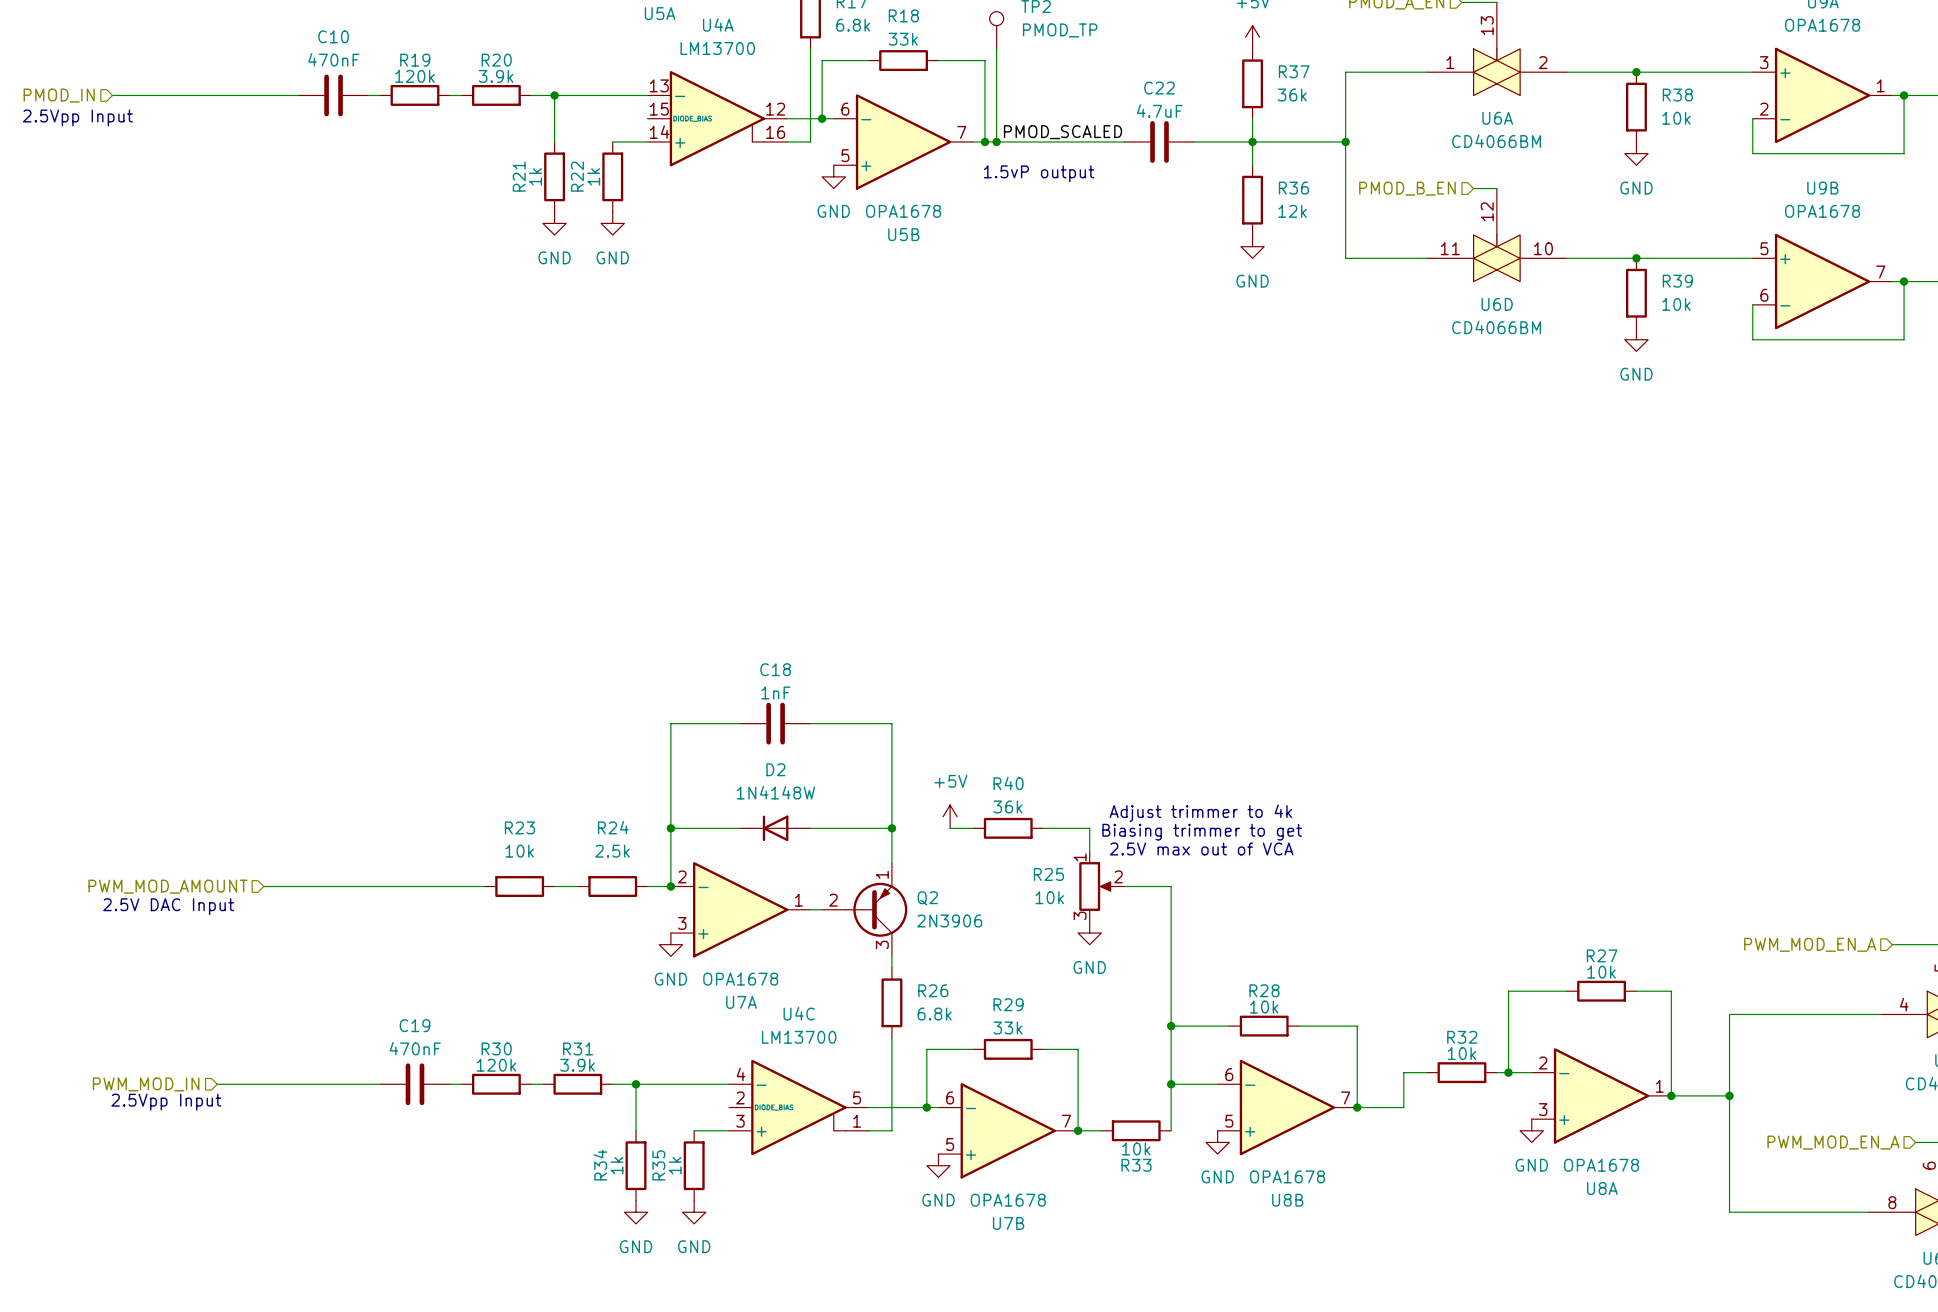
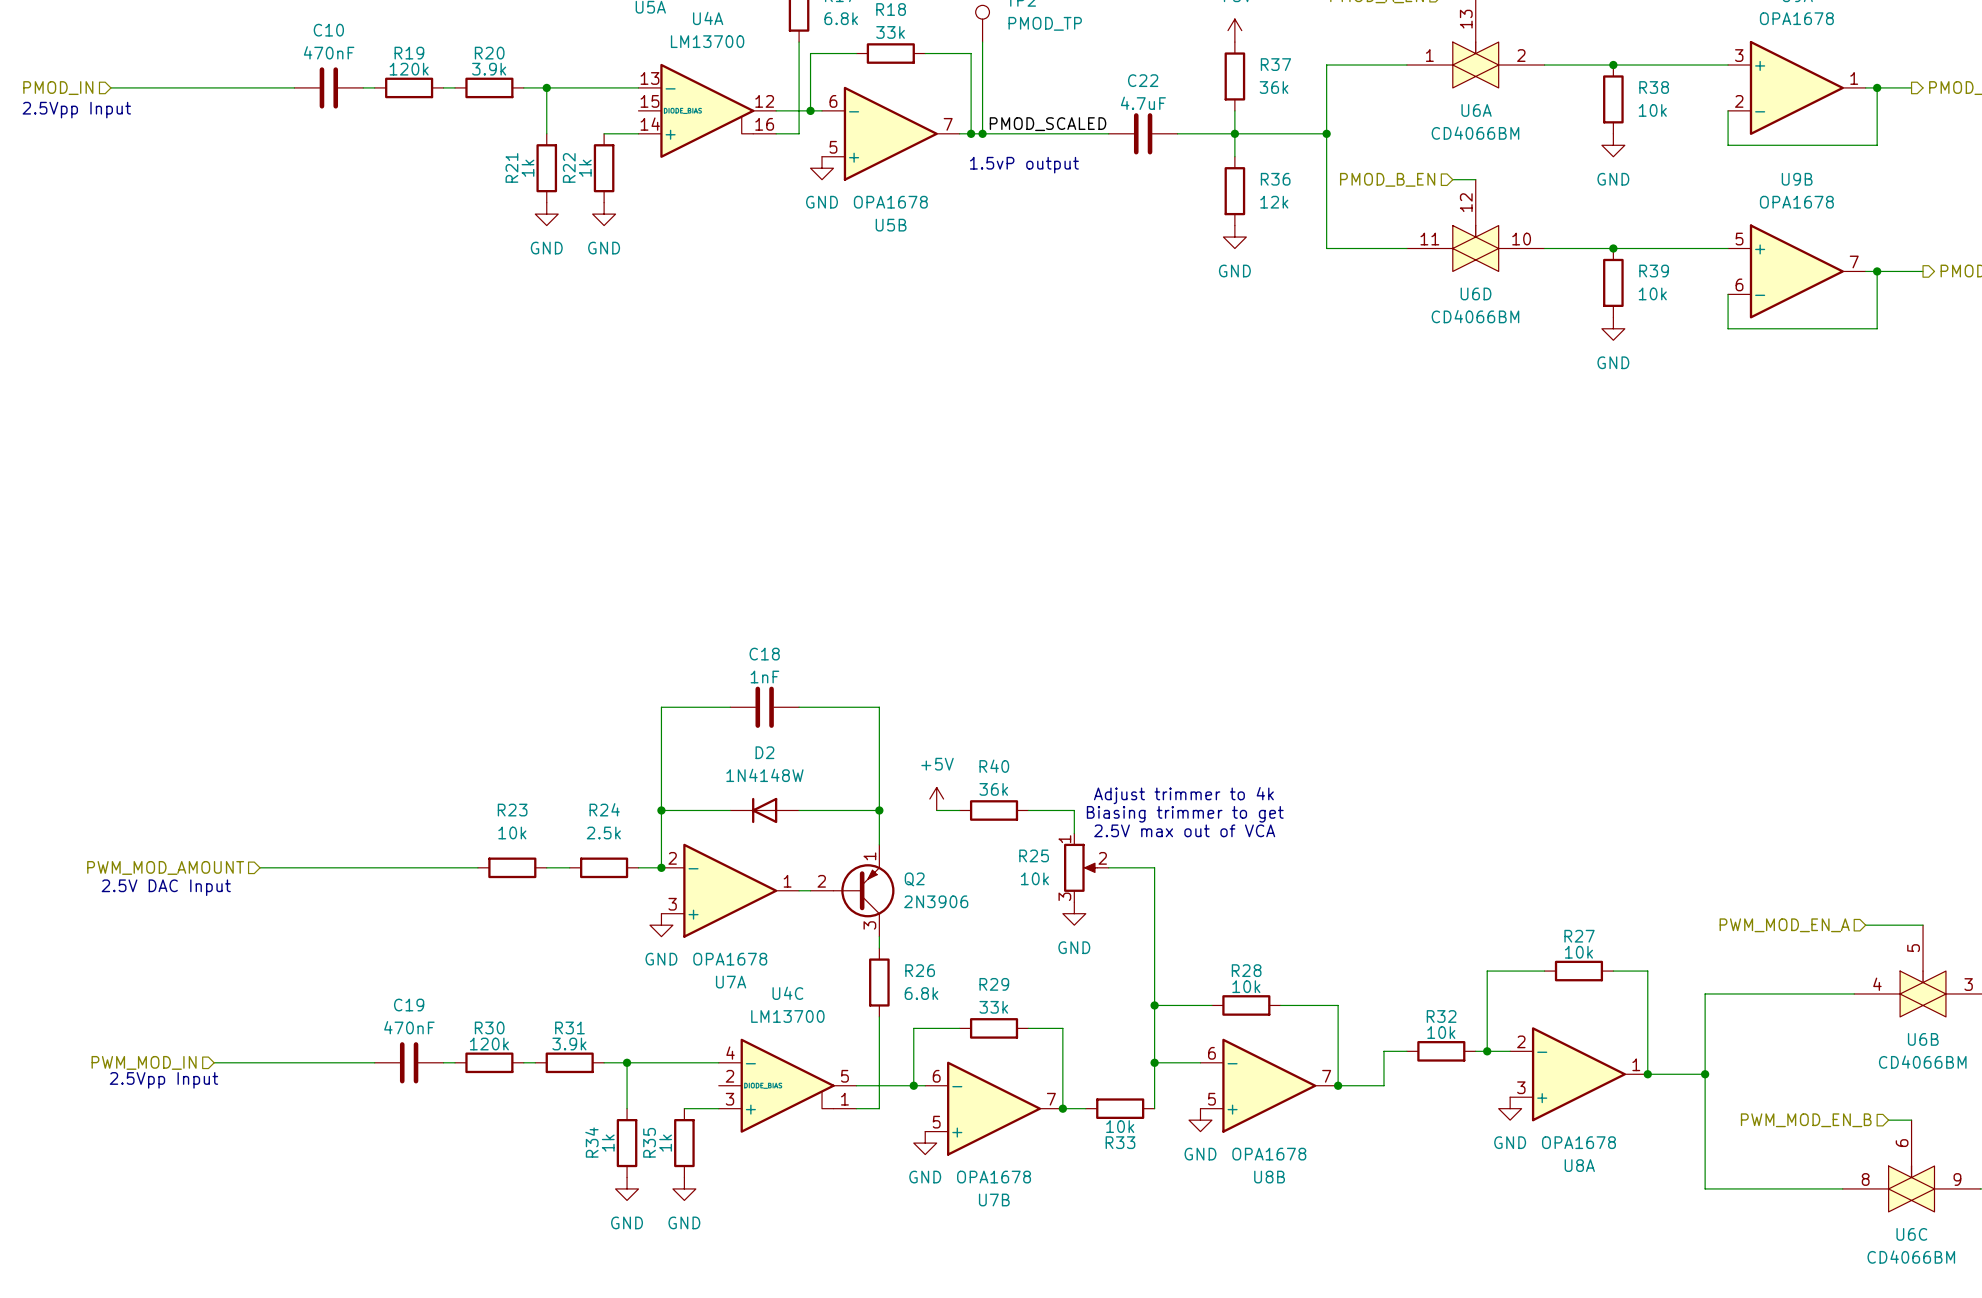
hierarchical label: PWM_MOD_EN_A (1833, 1142) -> PWM_MOD_EN_B (1806, 1120)

